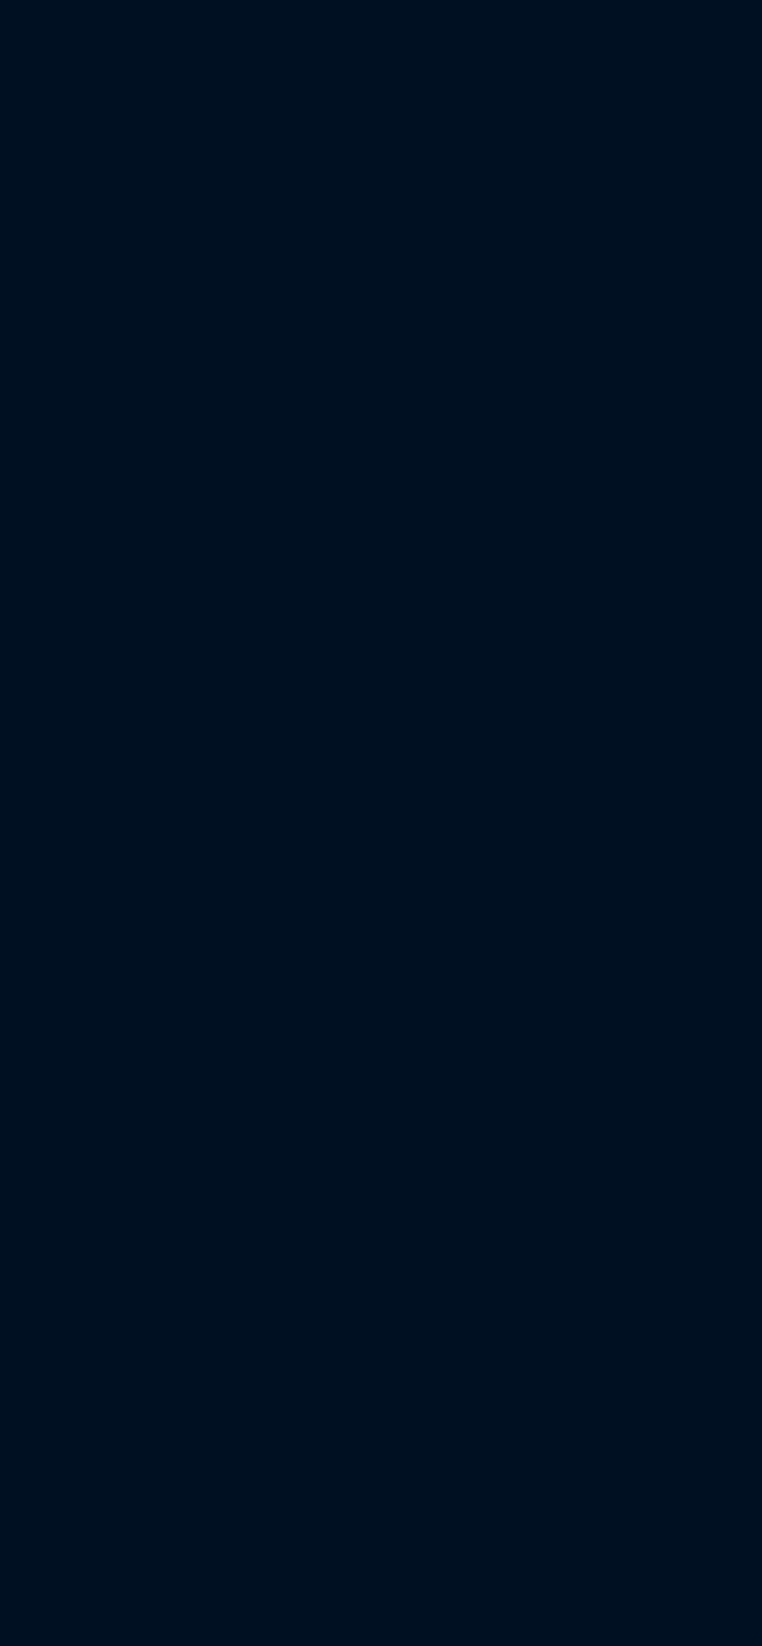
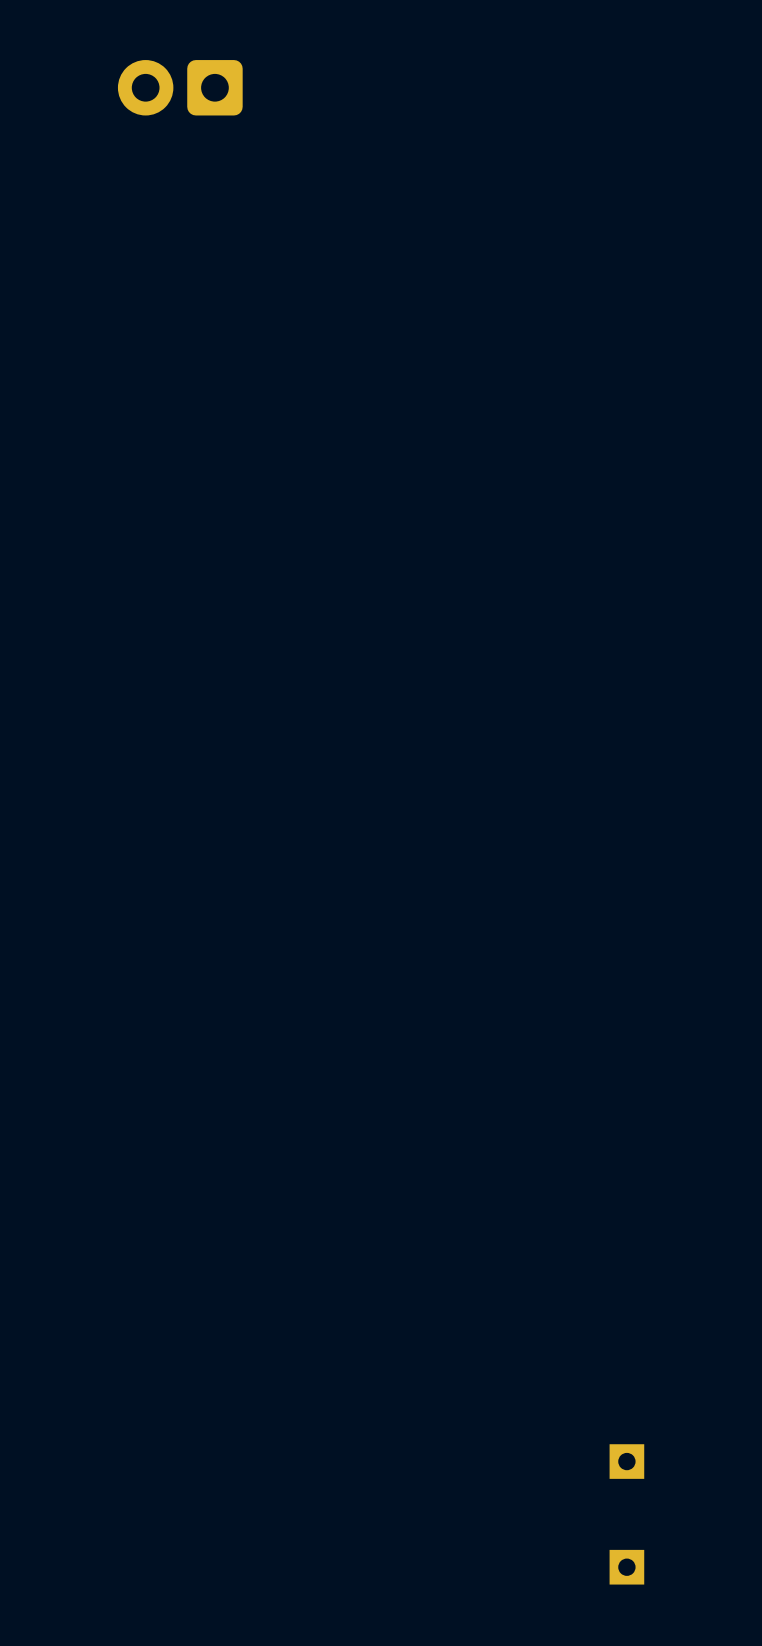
part: none -> (180, 87)
part: none -> (626, 1461)
part: none -> (626, 1567)

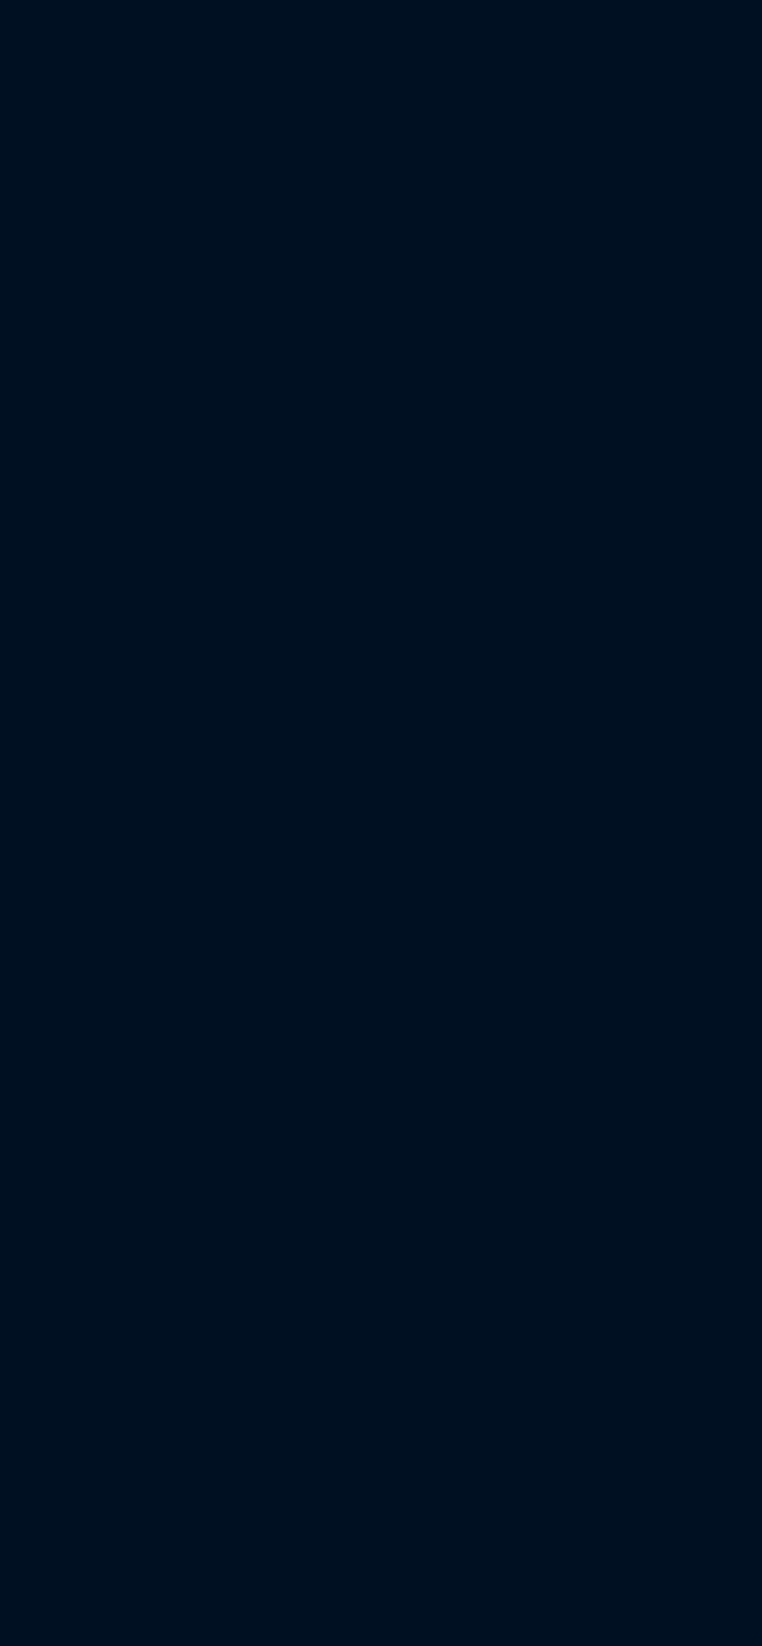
part: (180, 87) -> none
part: (626, 1461) -> none
part: (626, 1567) -> none

